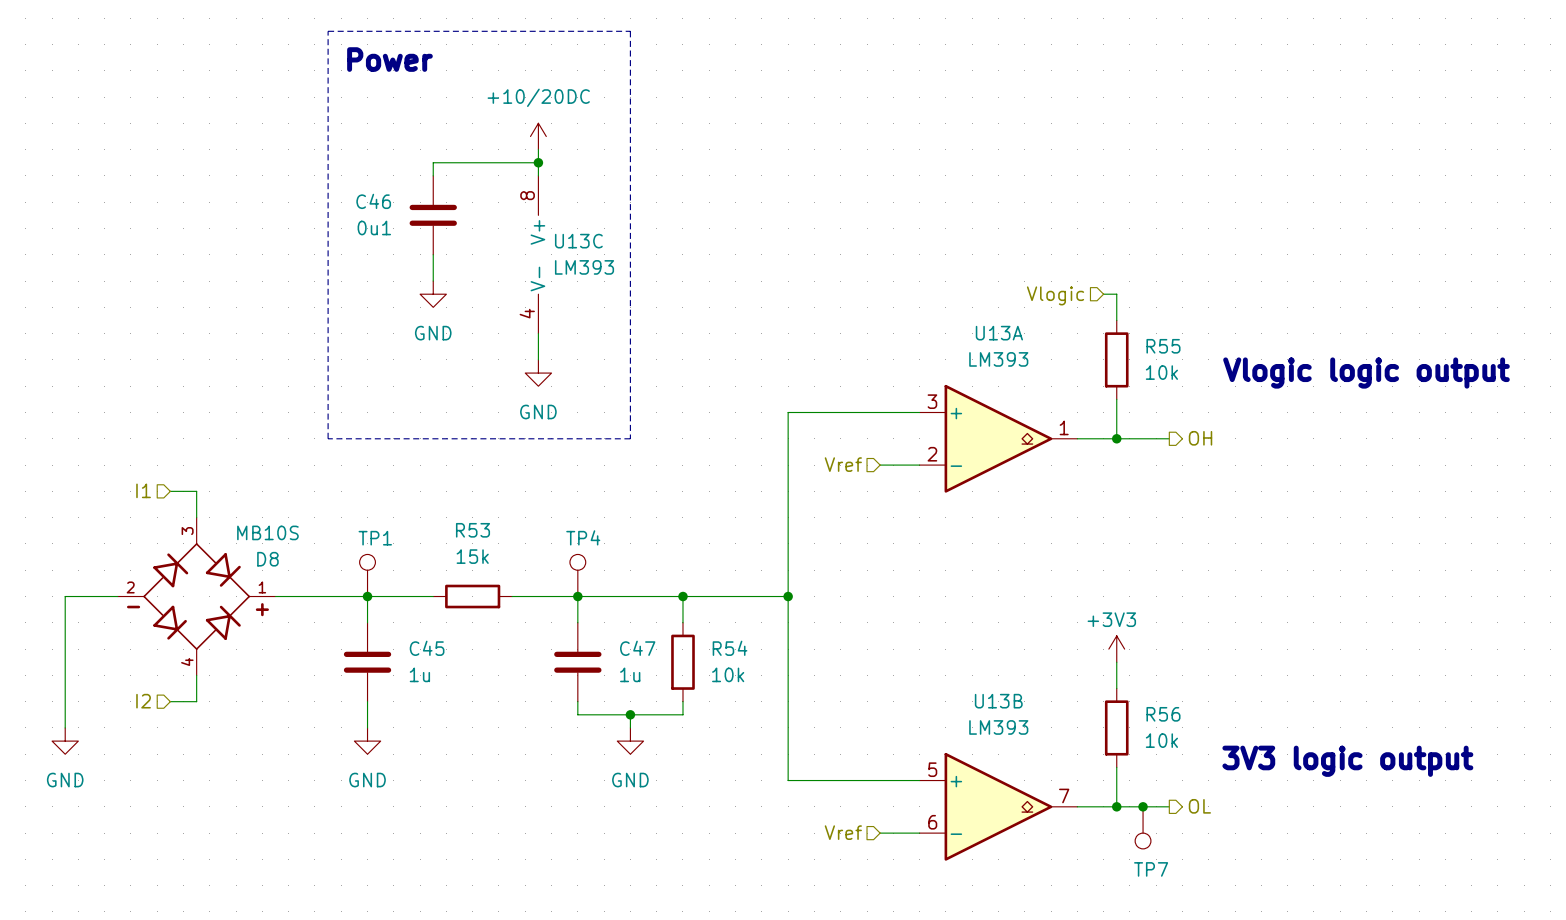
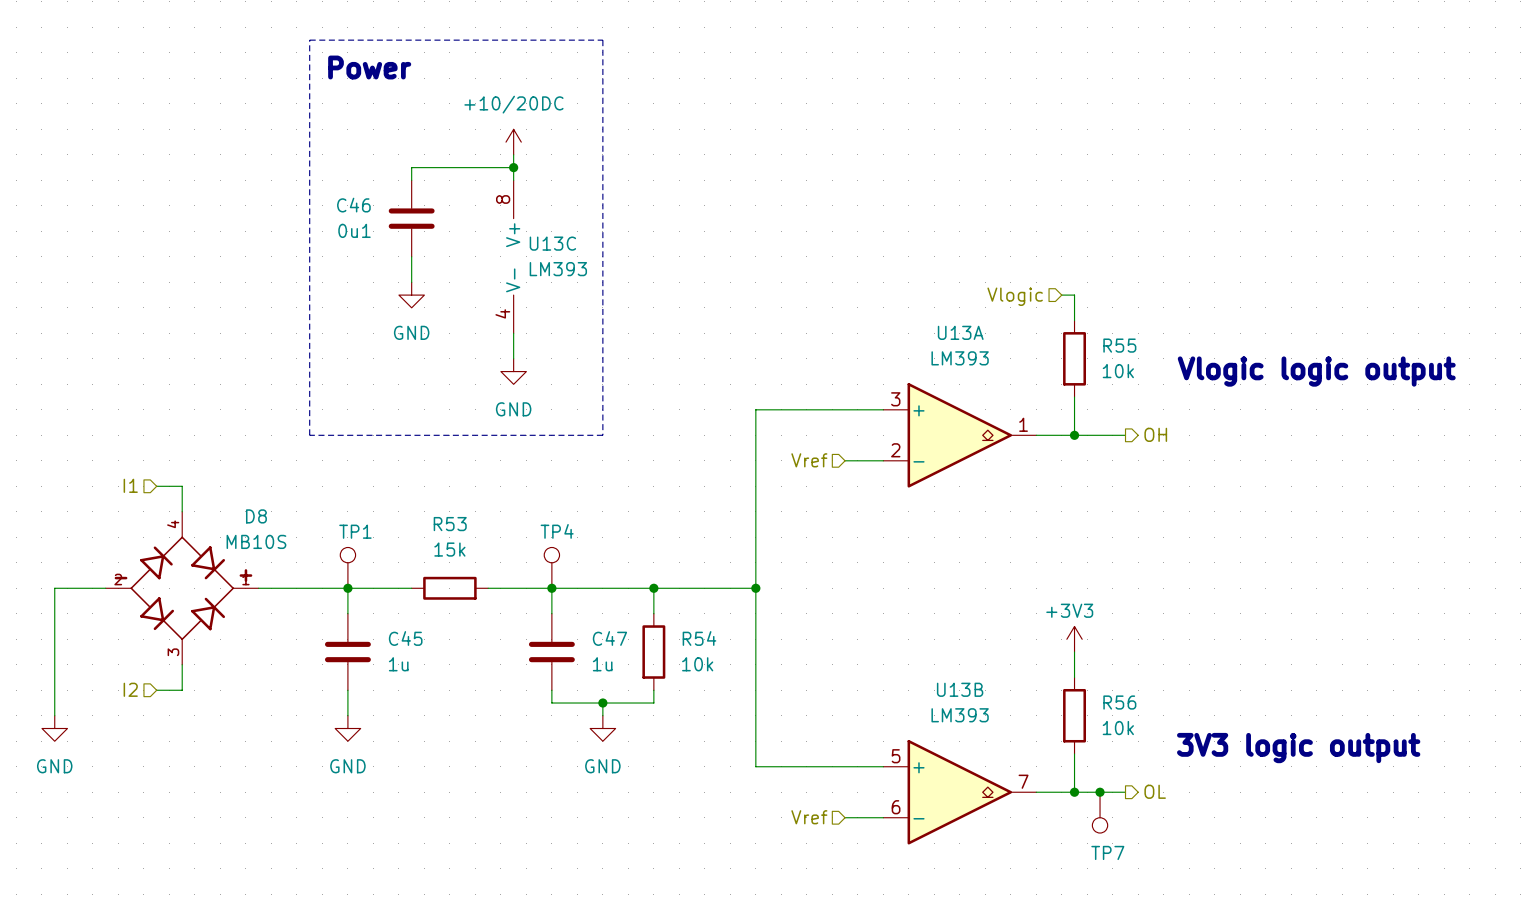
D8 name position: D8 (267, 559) -> D8 (256, 516)
D8 flip: as is (197, 596) -> up-down (183, 588)

